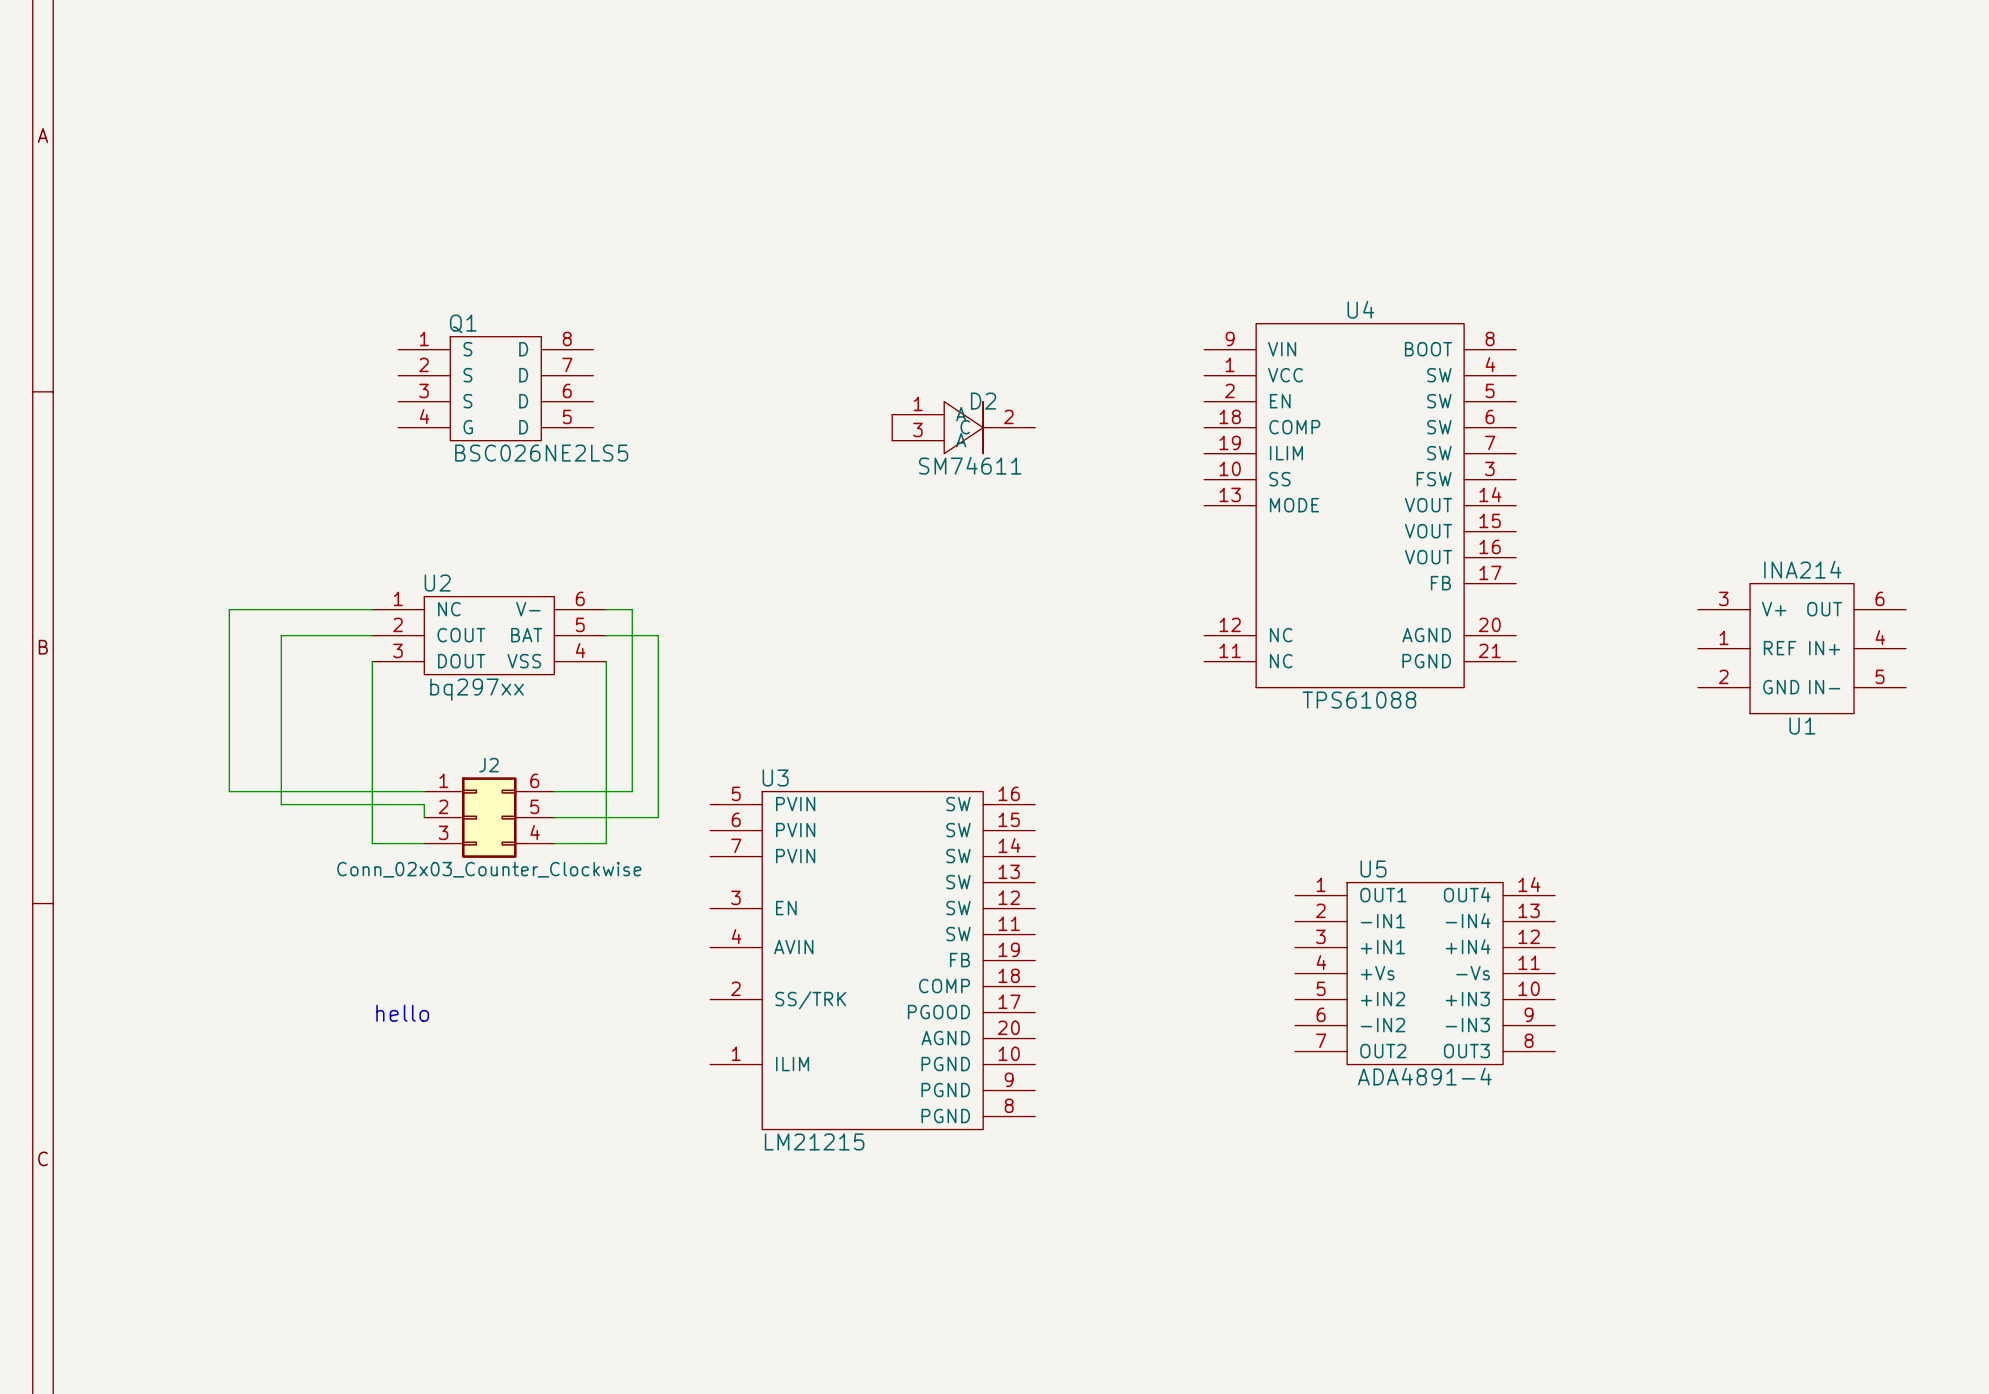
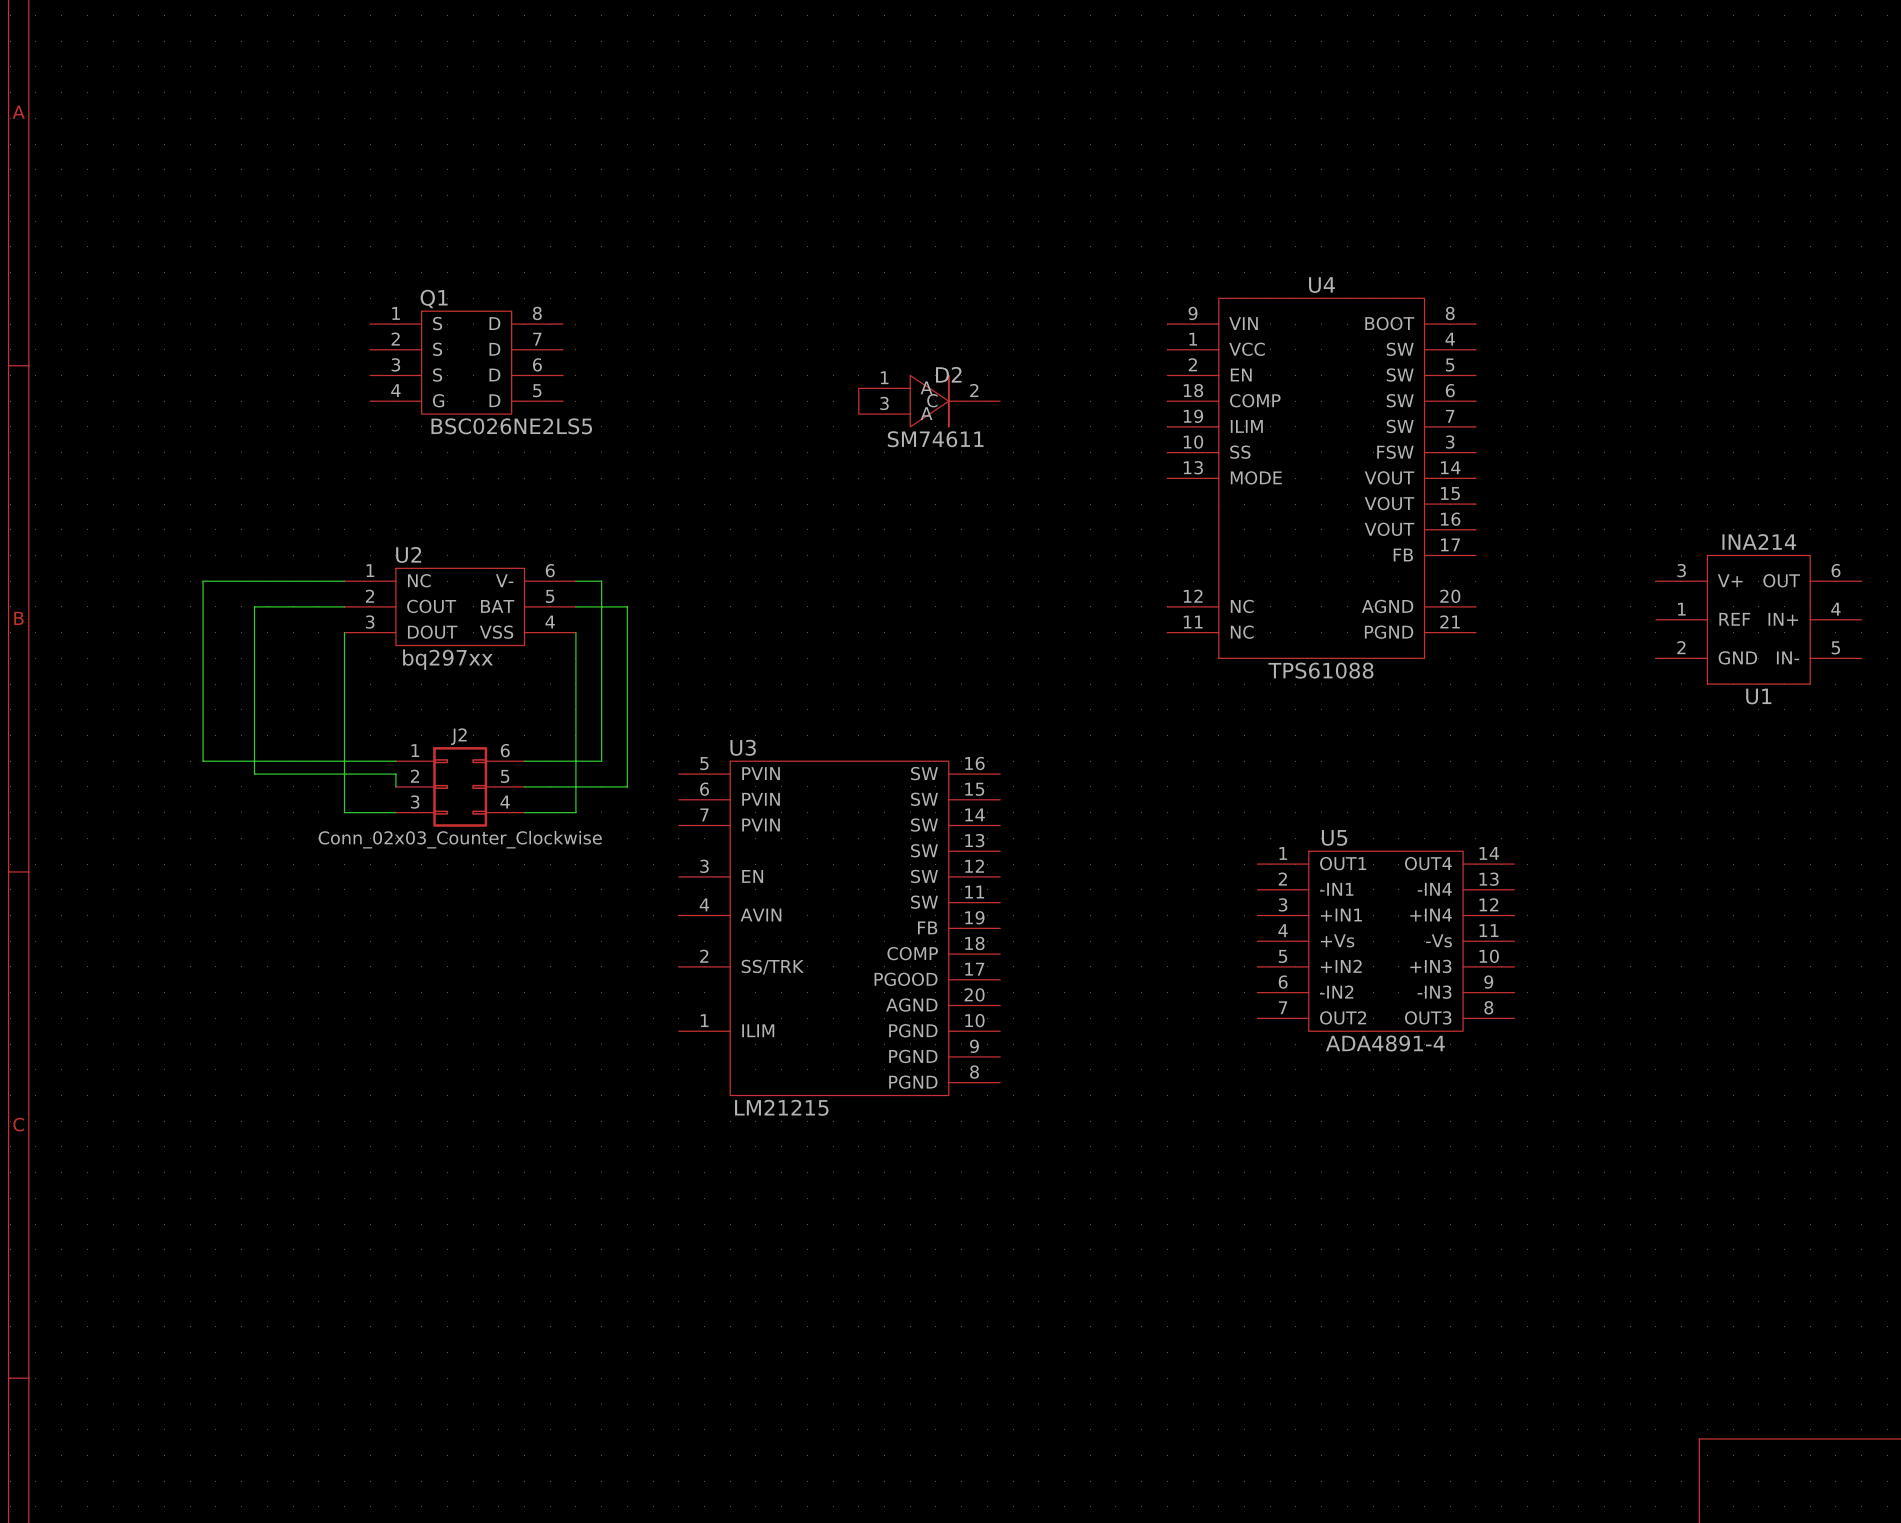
text: hello (402, 1013) -> none

